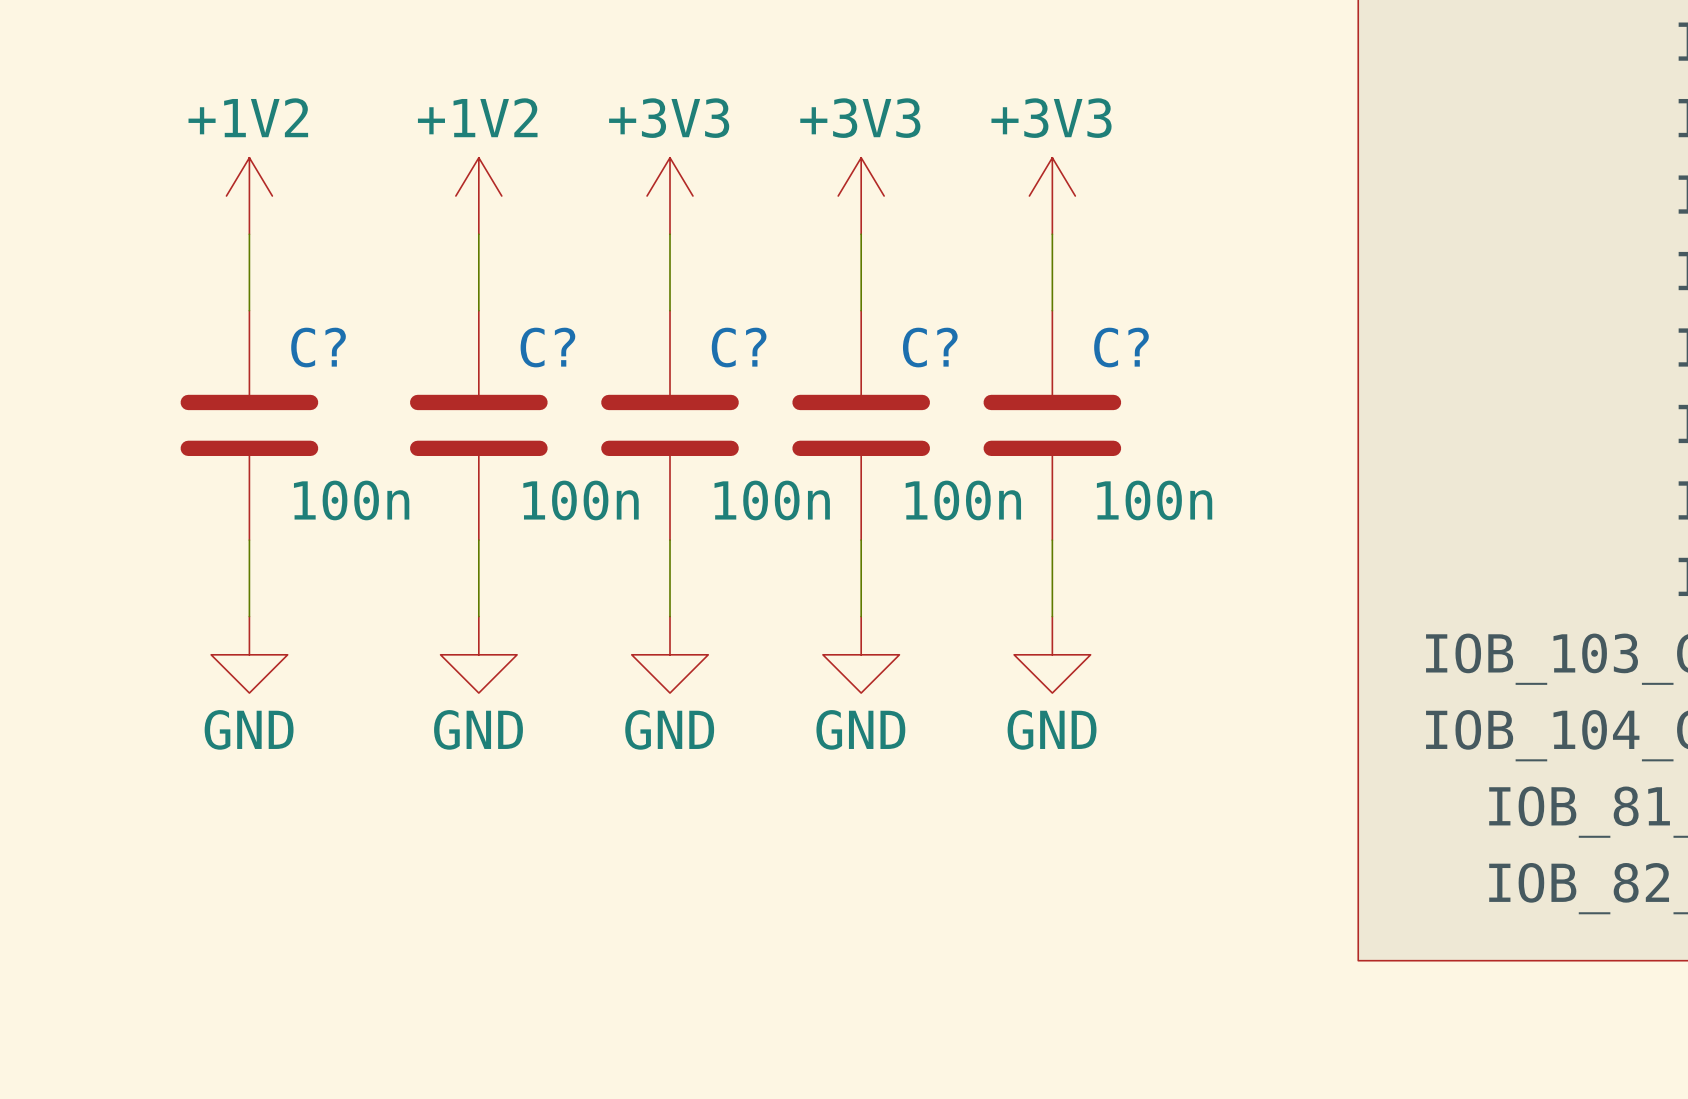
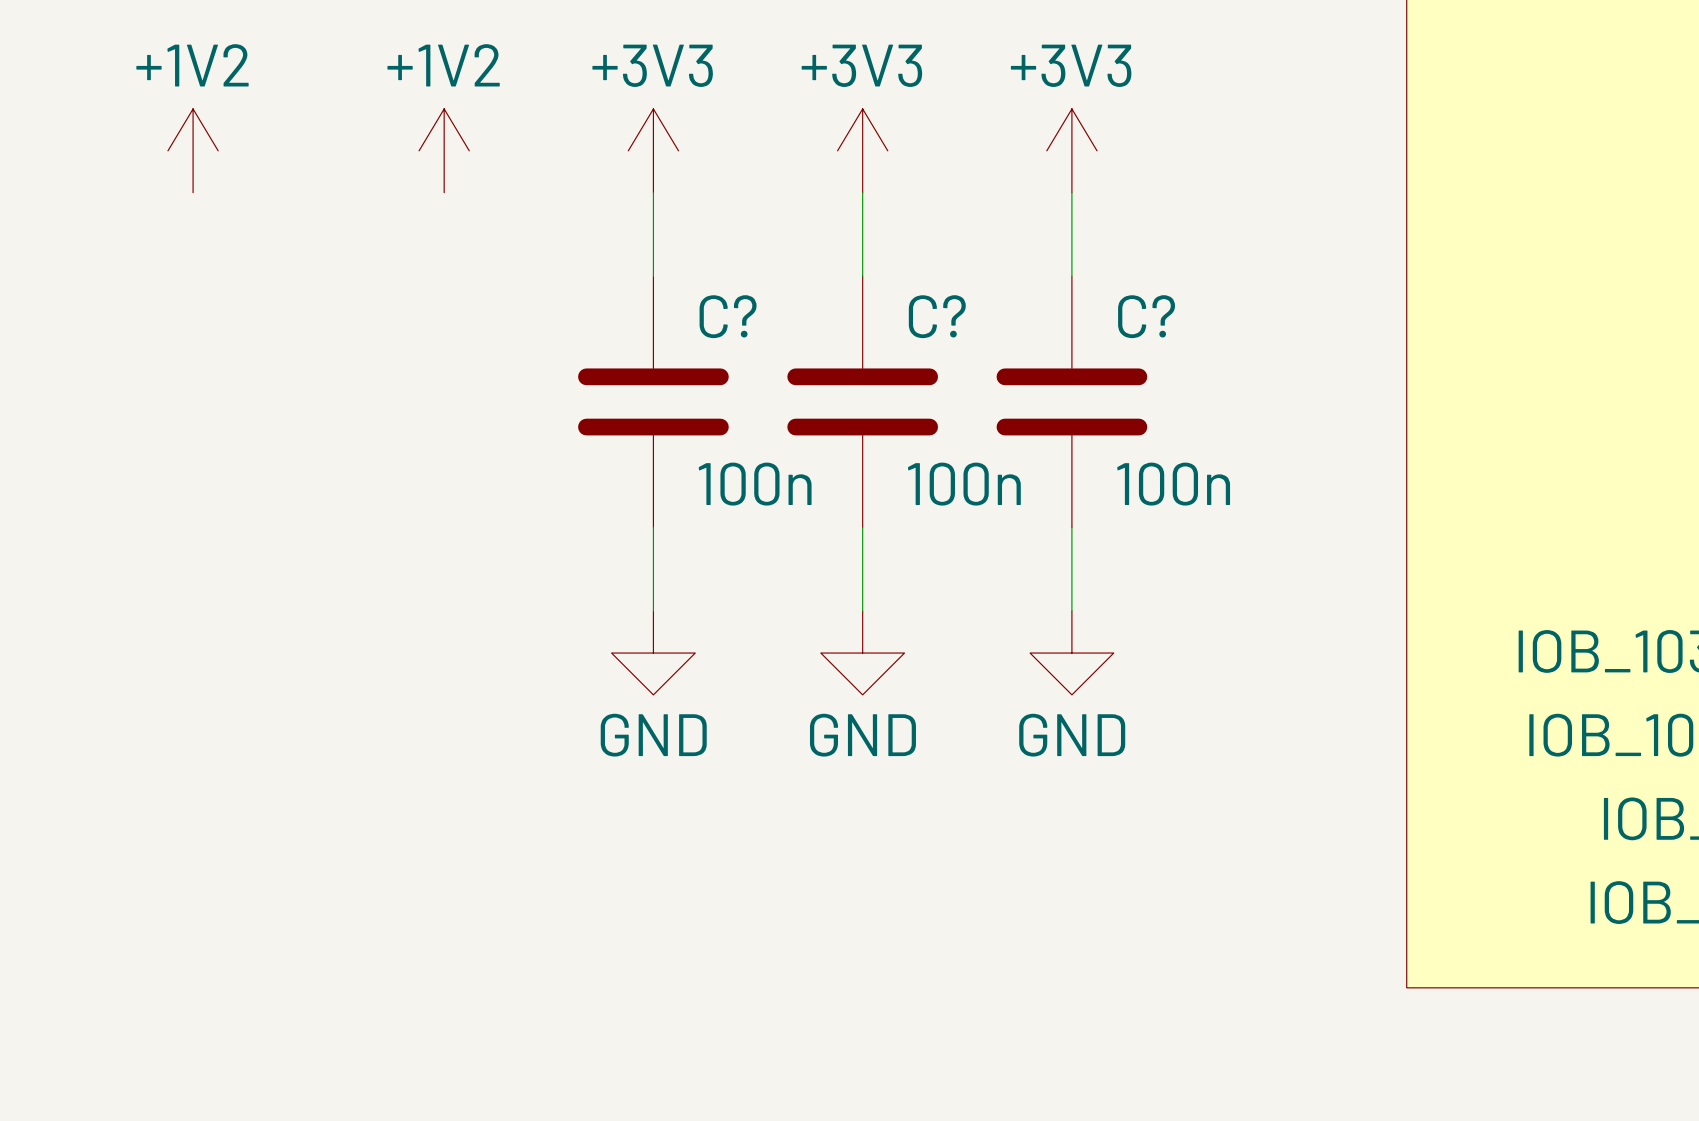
wire: (249, 234) (249, 310) -> none
wire: (478, 234) (478, 310) -> none
C?: 100n (249, 425) -> none
C?: 100n (478, 425) -> none
wire: (249, 540) (249, 616) -> none
wire: (478, 540) (478, 616) -> none
power symbol: GND (249, 654) -> none
power symbol: GND (478, 654) -> none

